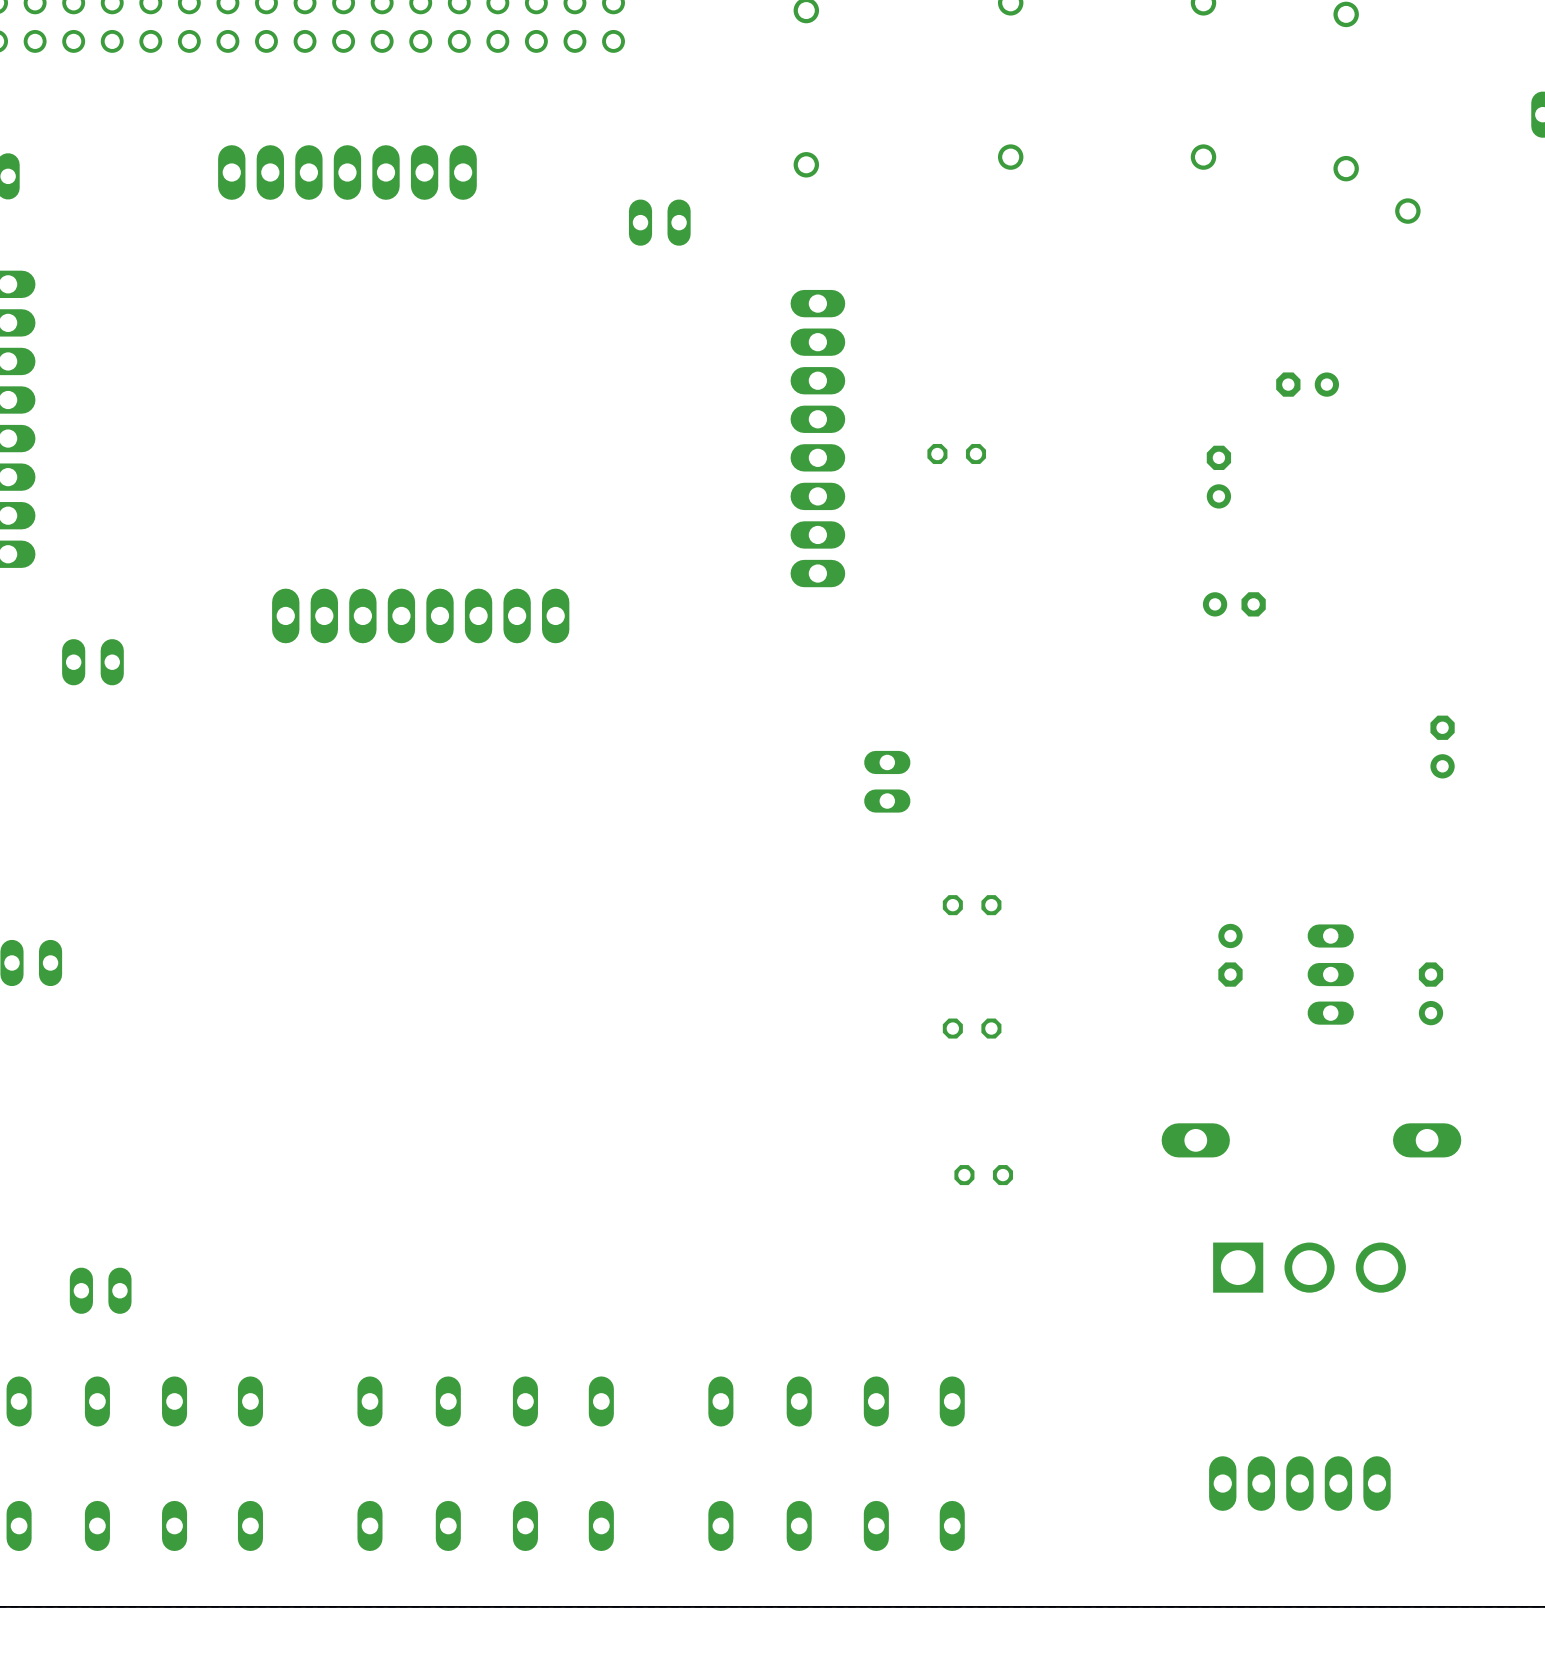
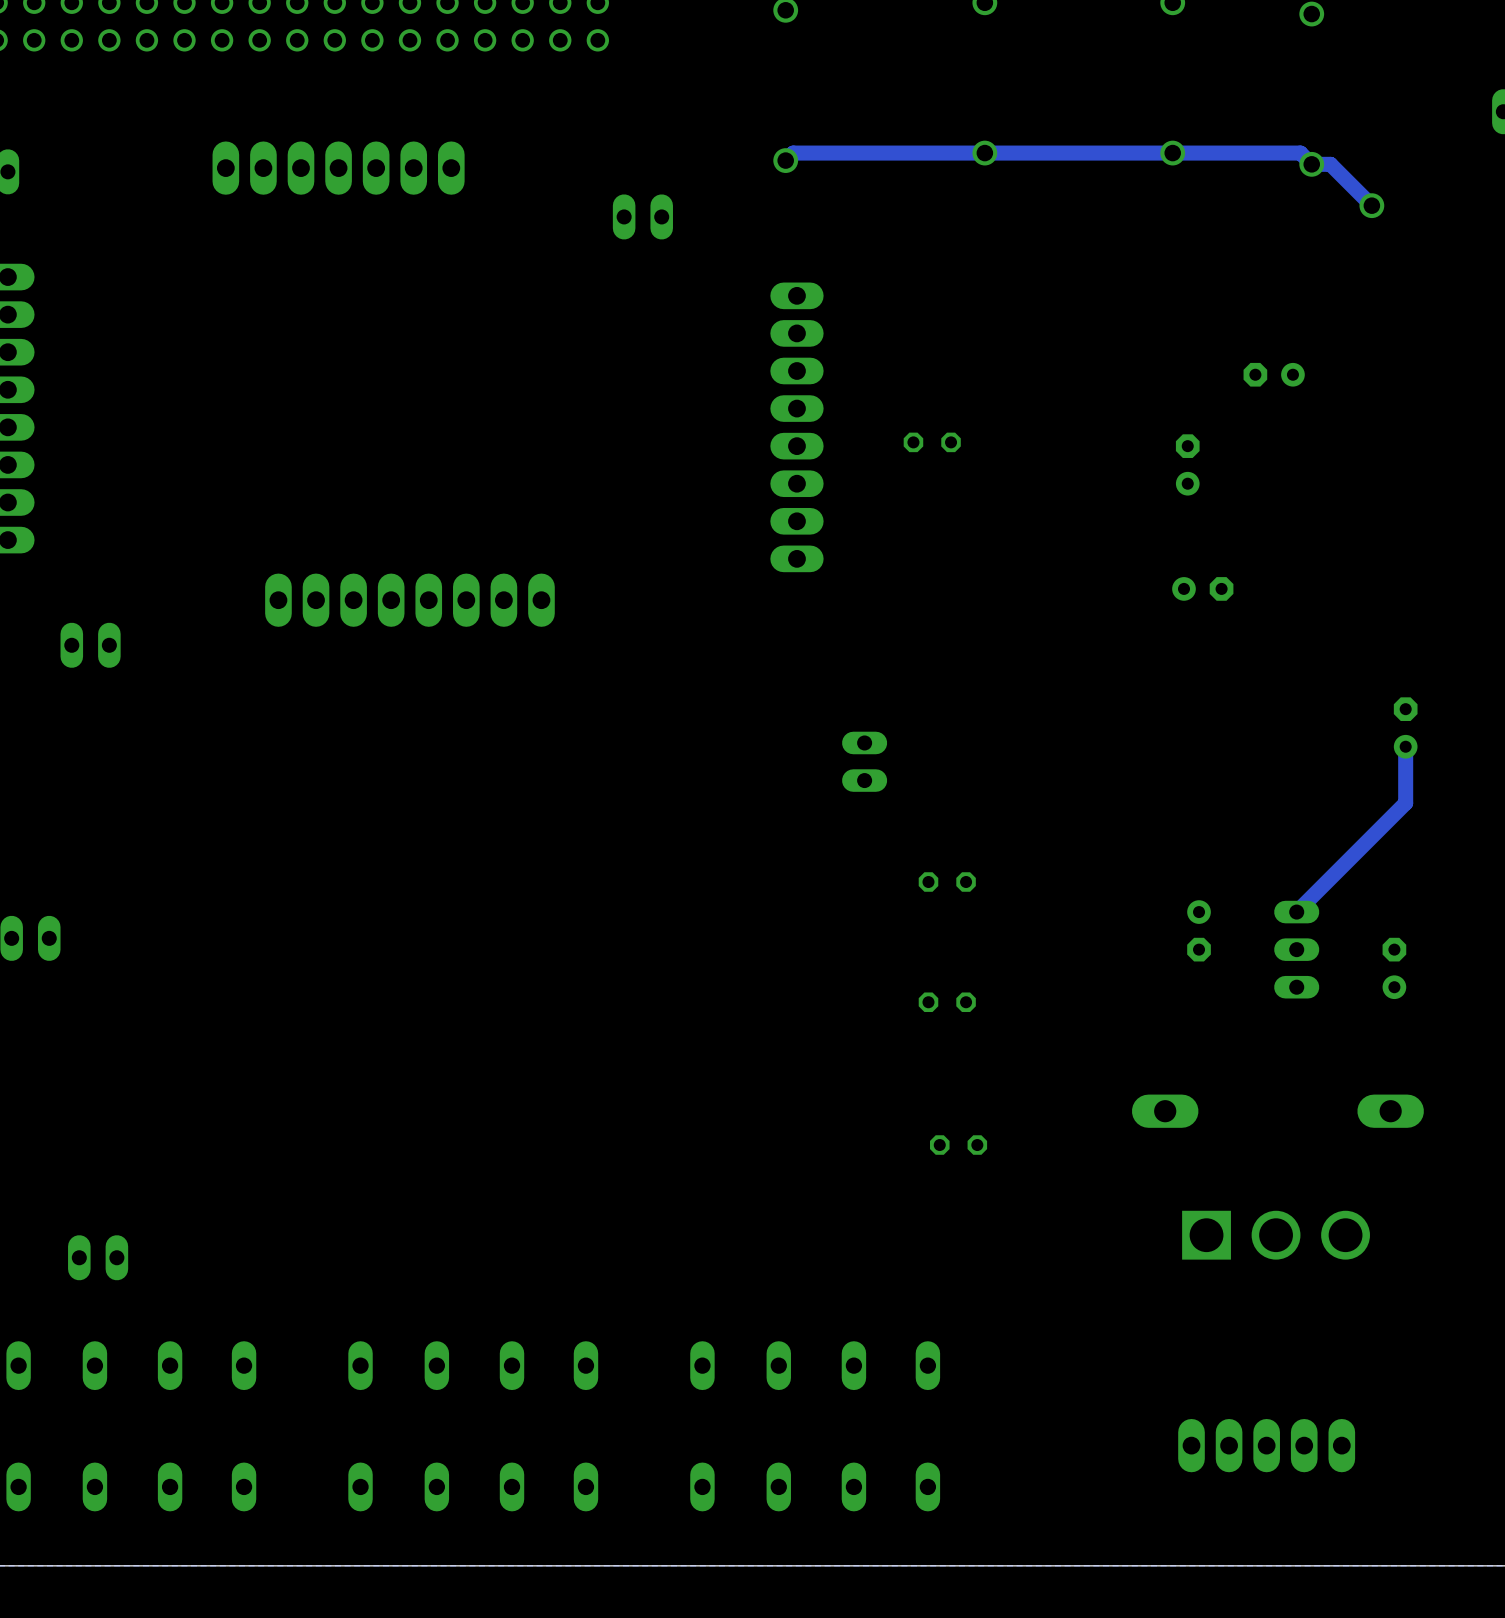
track: none -> (785, 160) (793, 153) (1300, 153) (1311, 164) (1330, 164) (1371, 205)
track: none -> (1405, 746) (1405, 803) (1296, 912)

